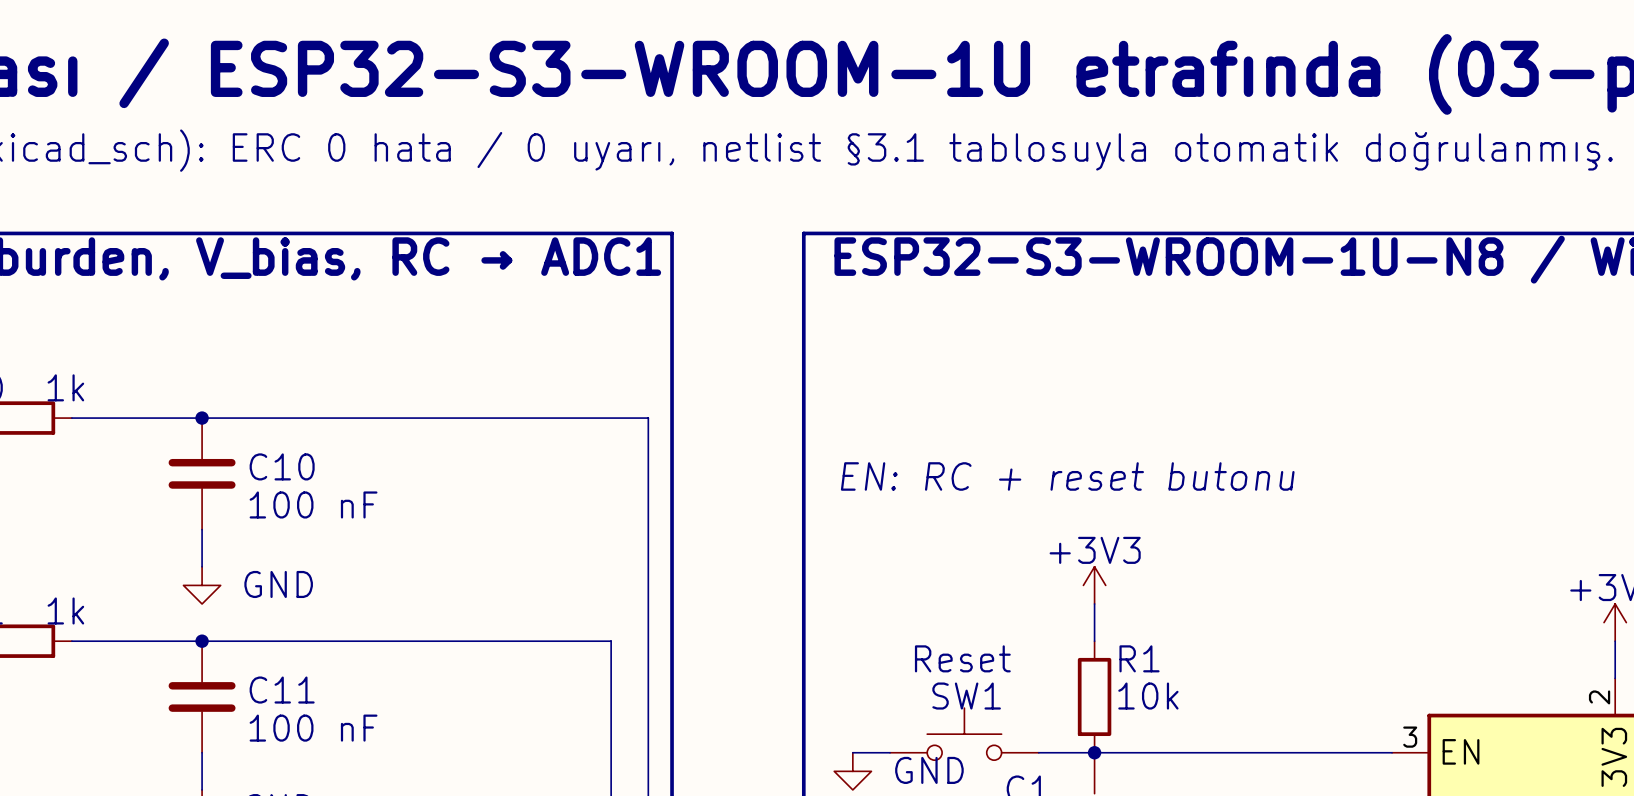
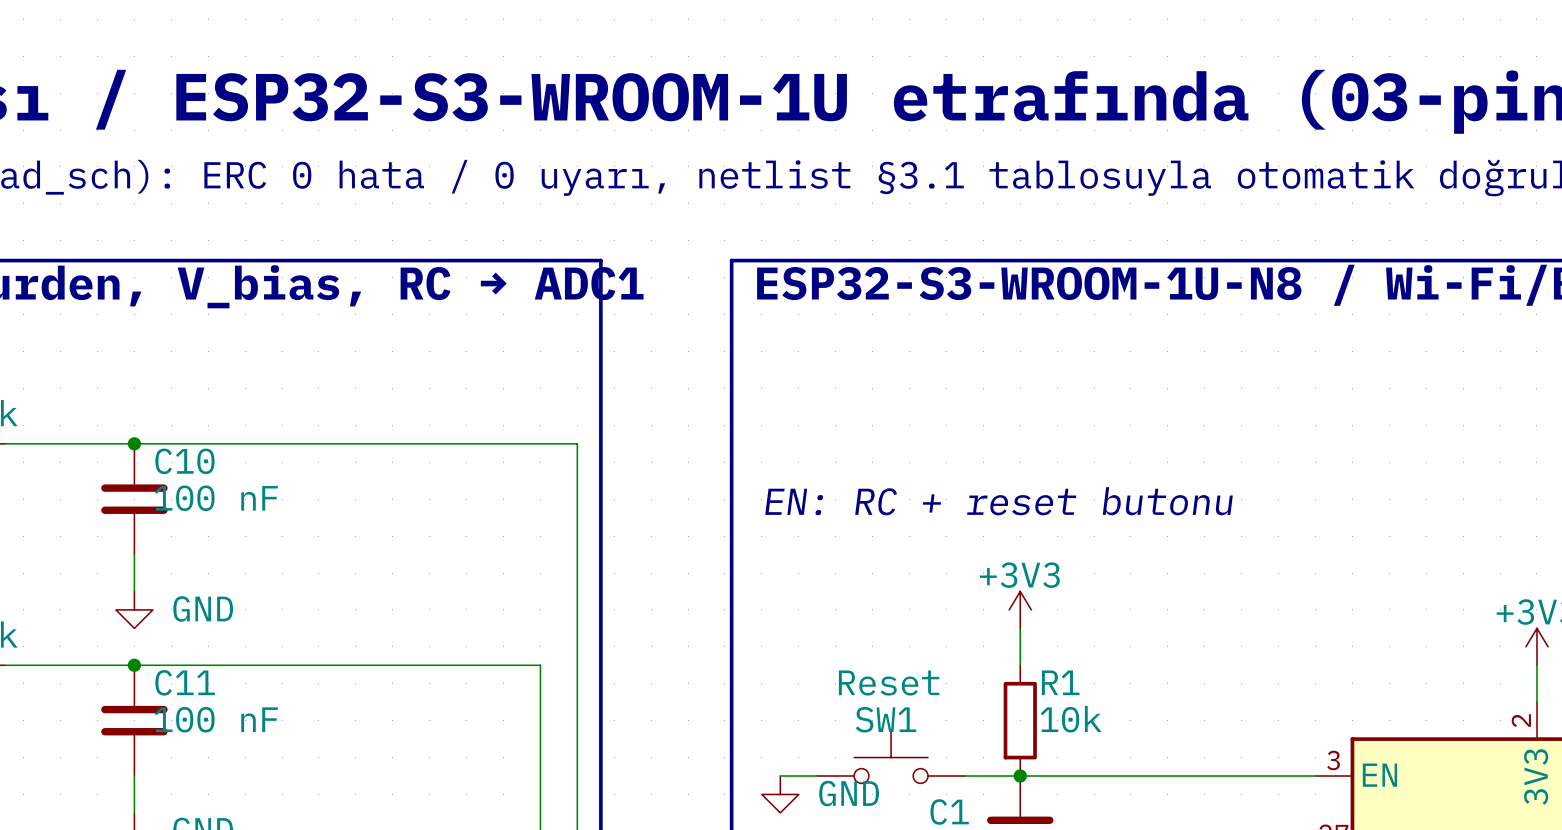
C10 name position: C10 (282, 466) -> C10 (184, 461)
C10 value position: 100 nF (313, 504) -> 100 nF (216, 498)
C11 name position: C11 (282, 690) -> C11 (185, 682)
C11 value position: 100 nF (313, 728) -> 100 nF (216, 719)

